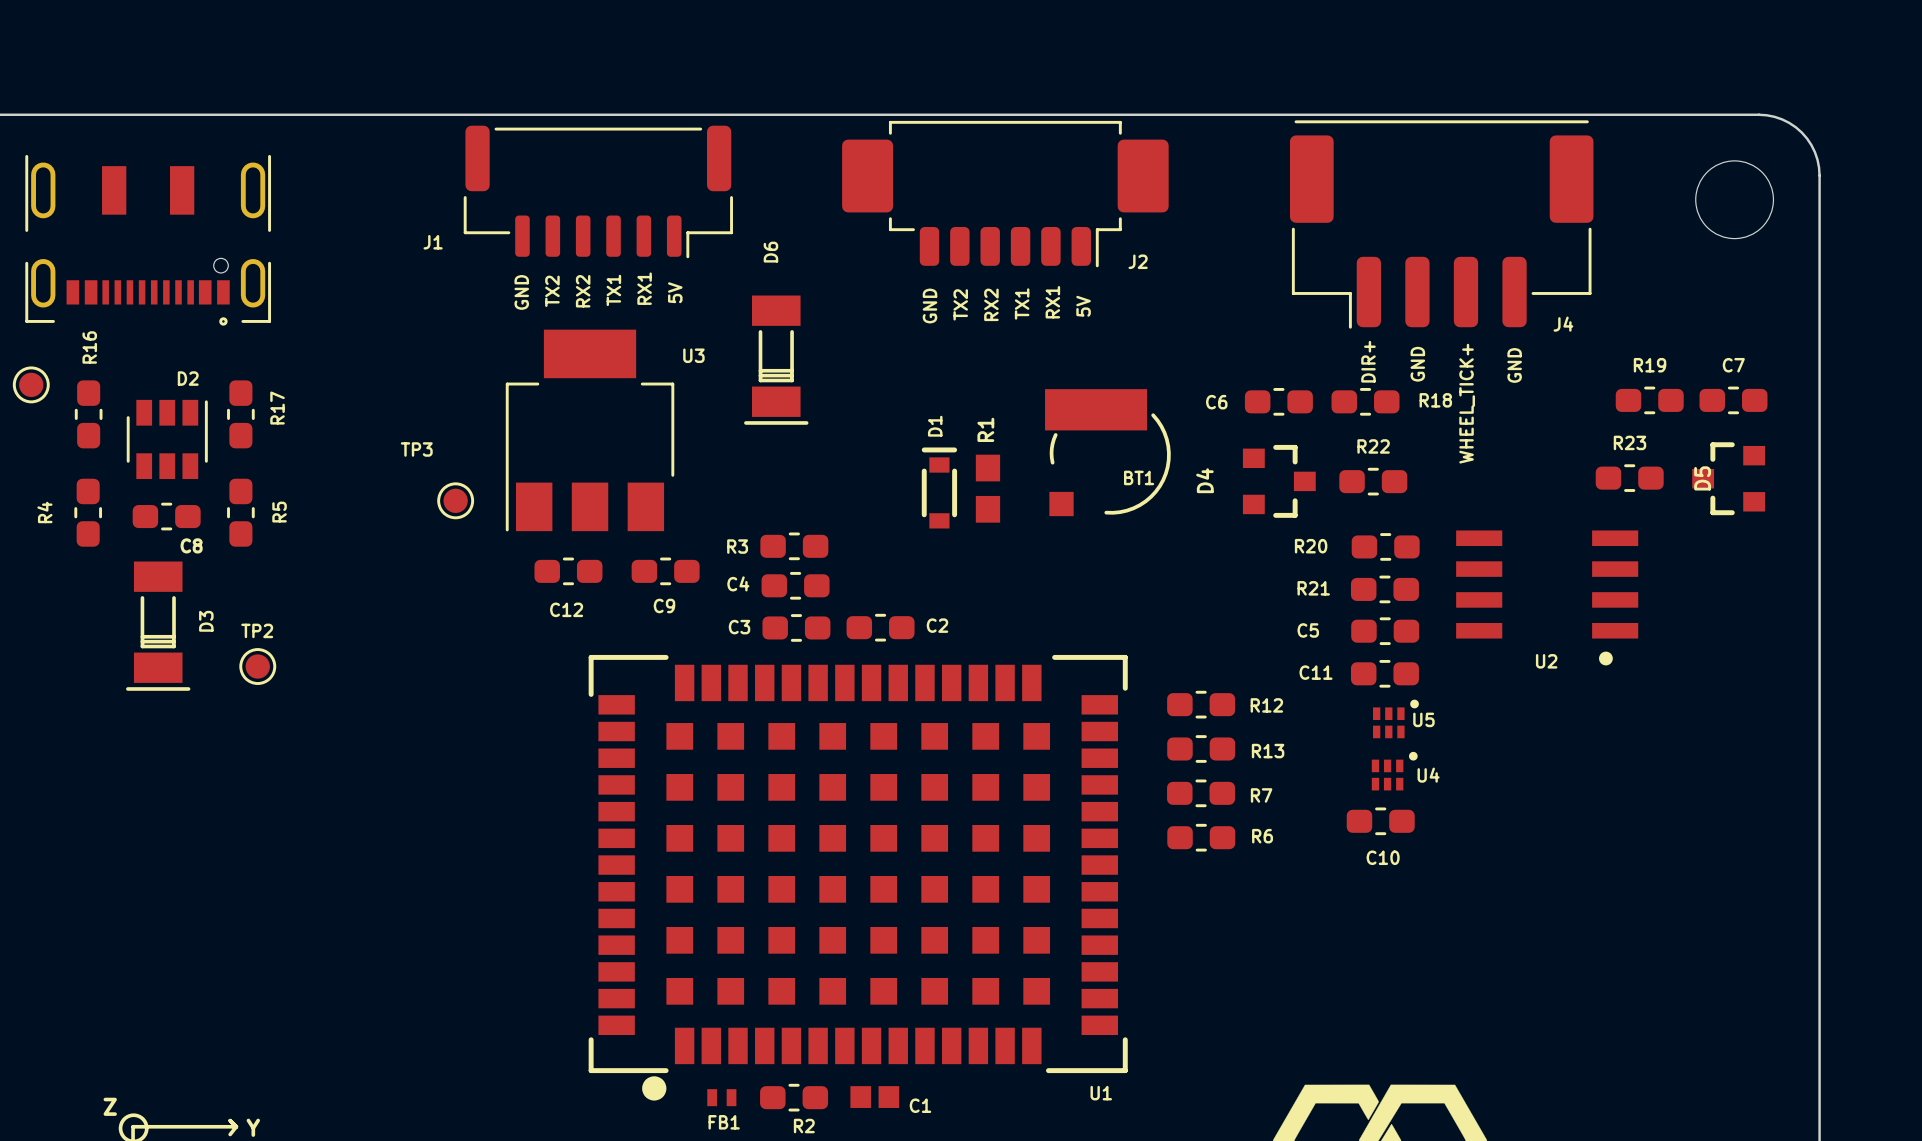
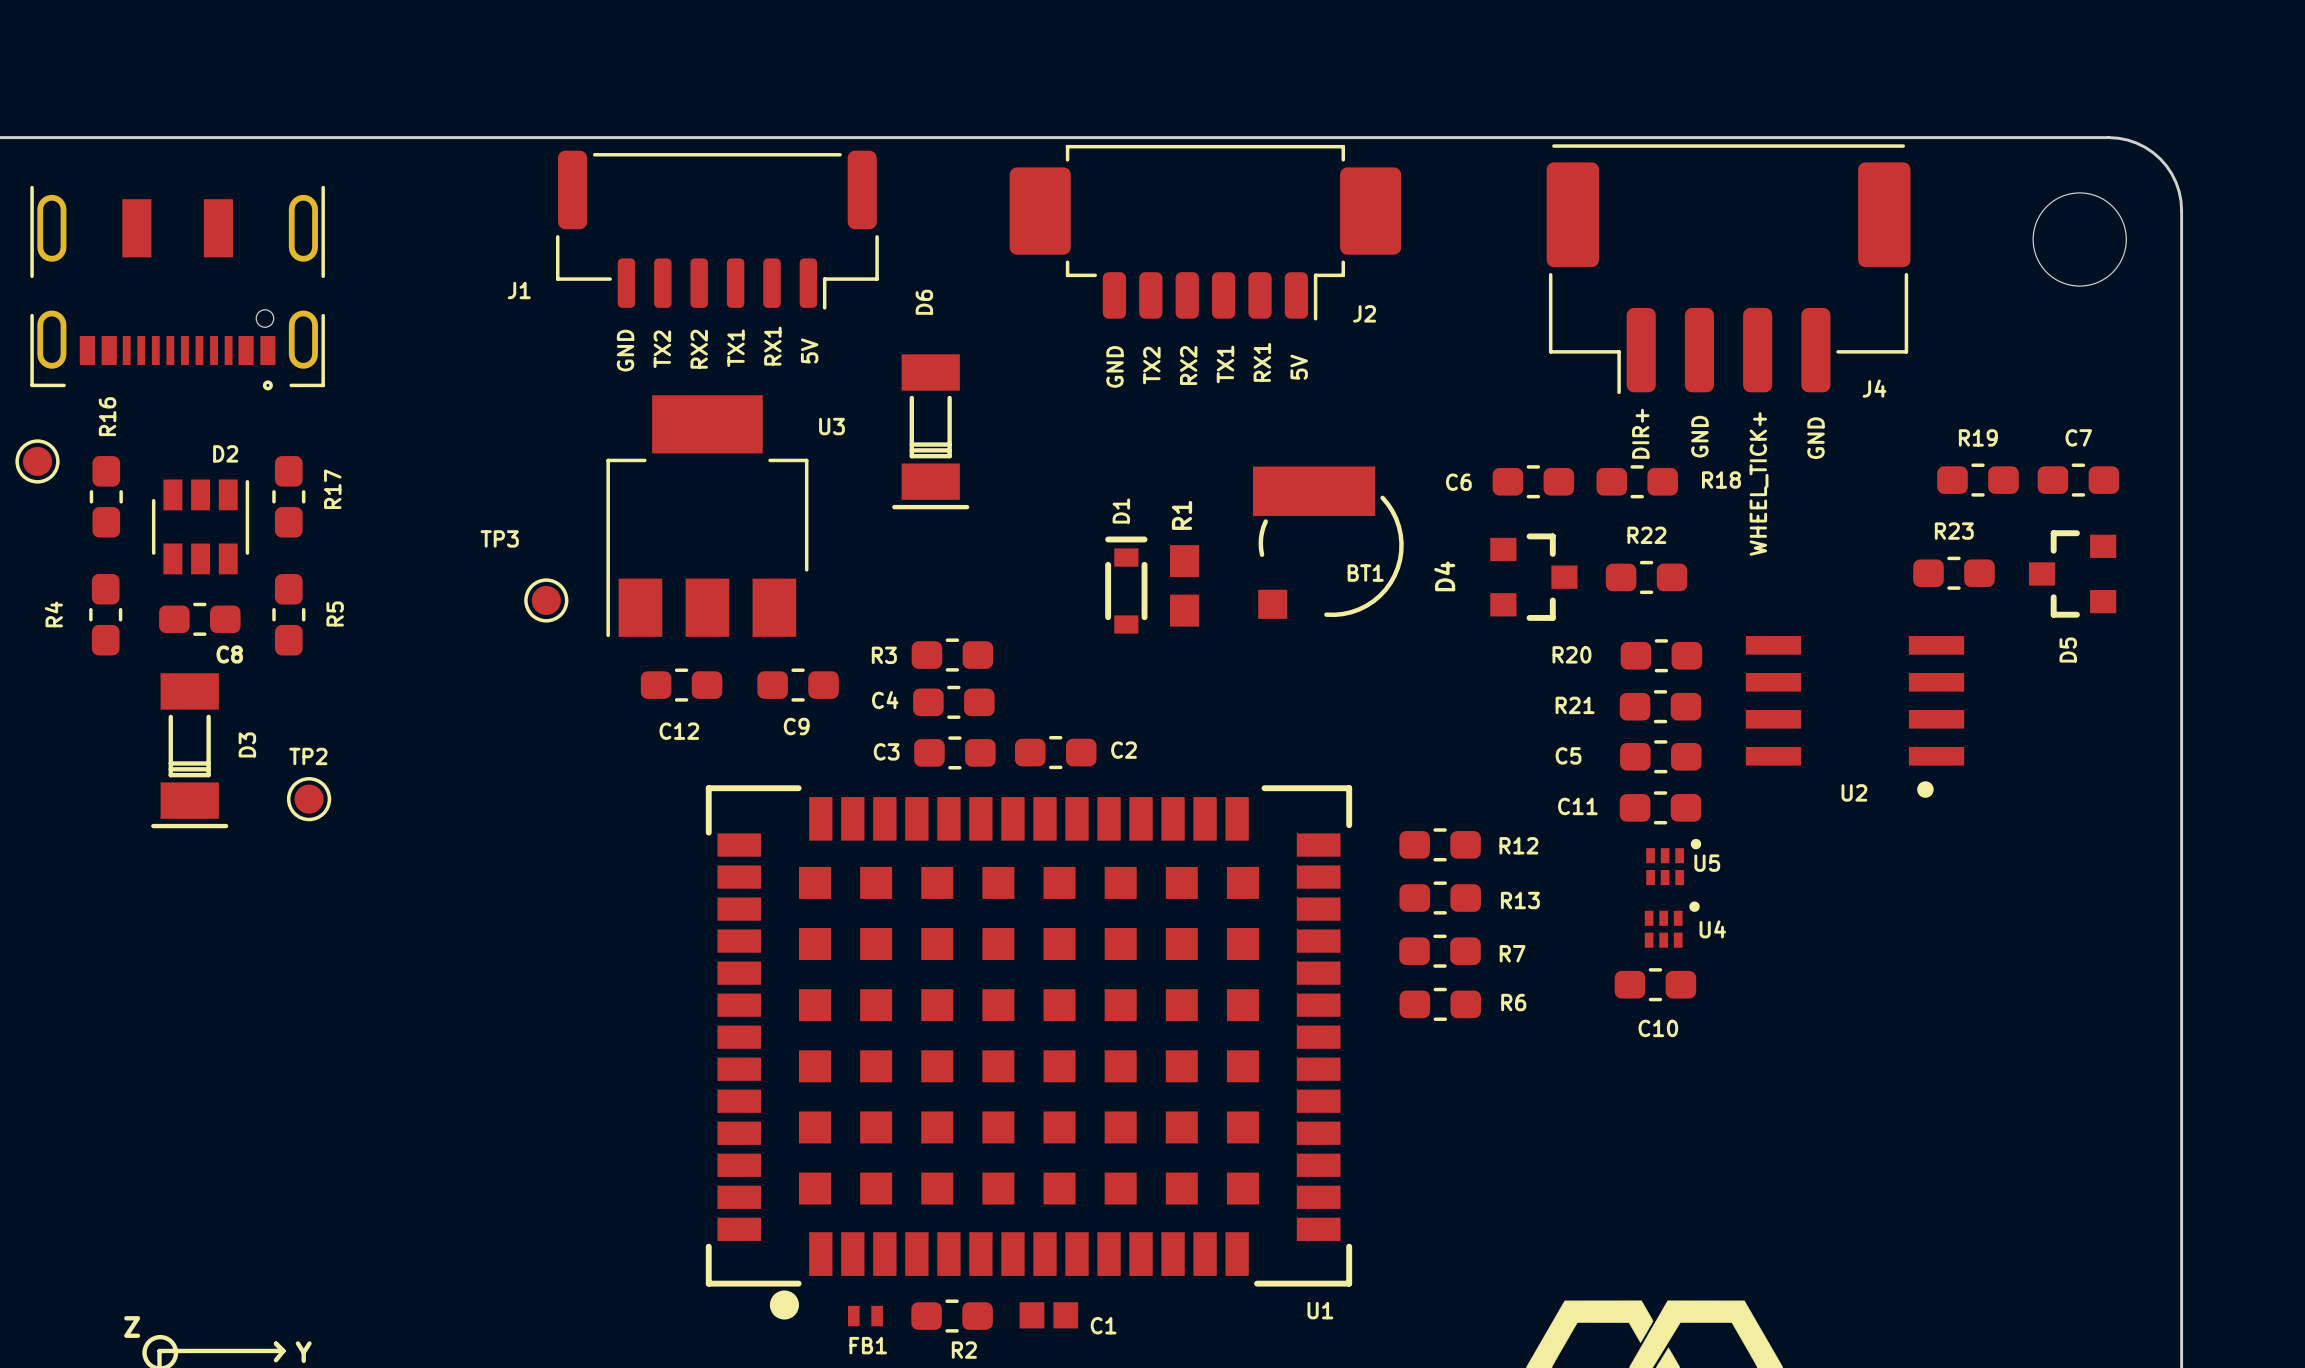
D5 name position: D5 (1702, 478) -> D5 (2068, 650)

